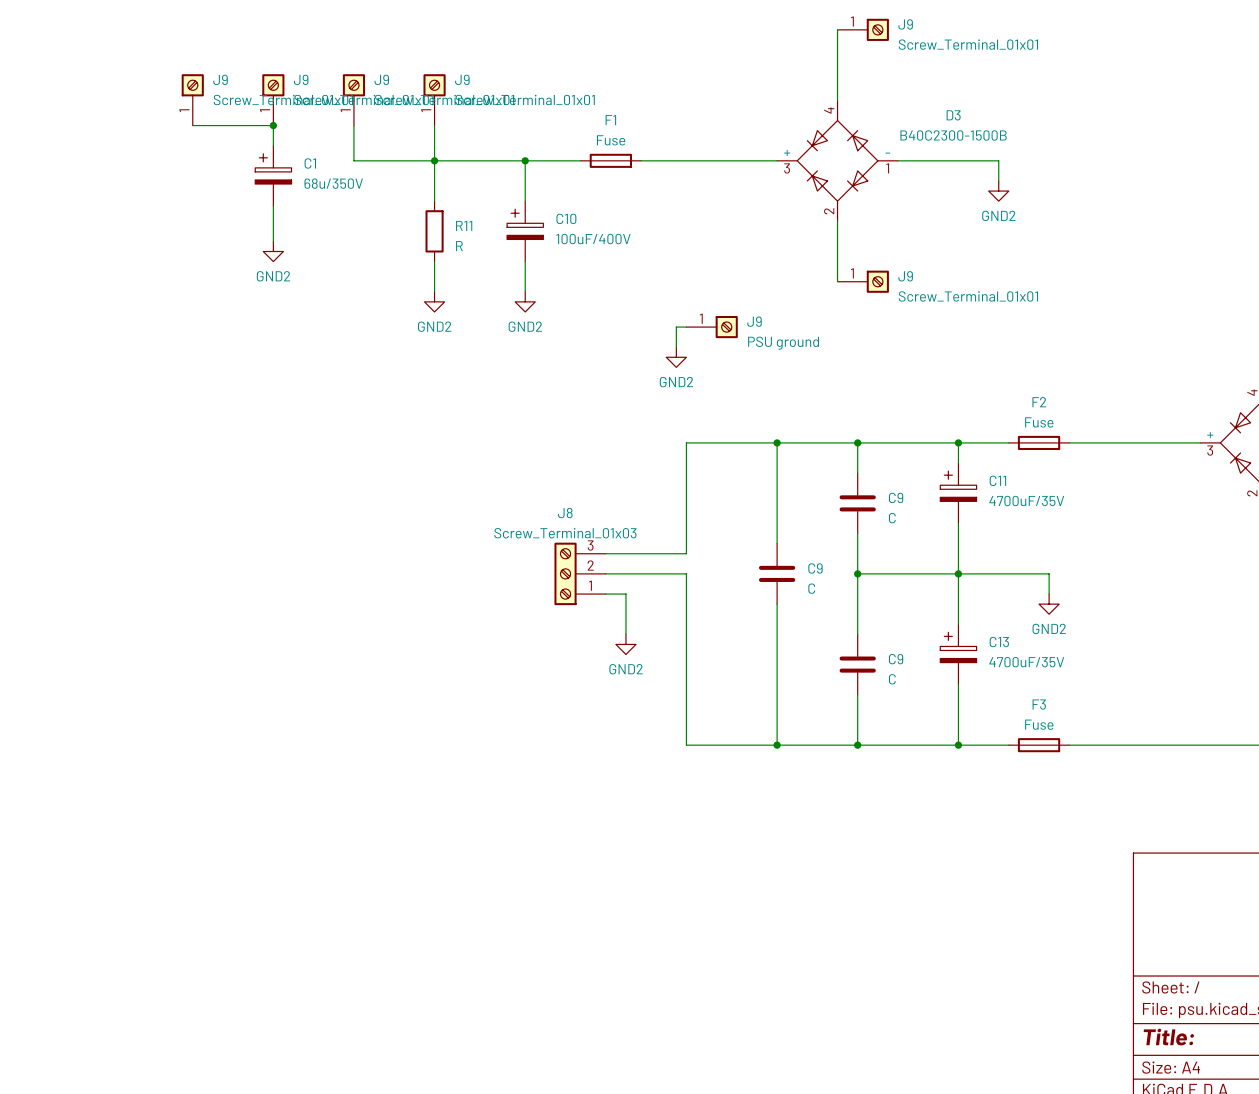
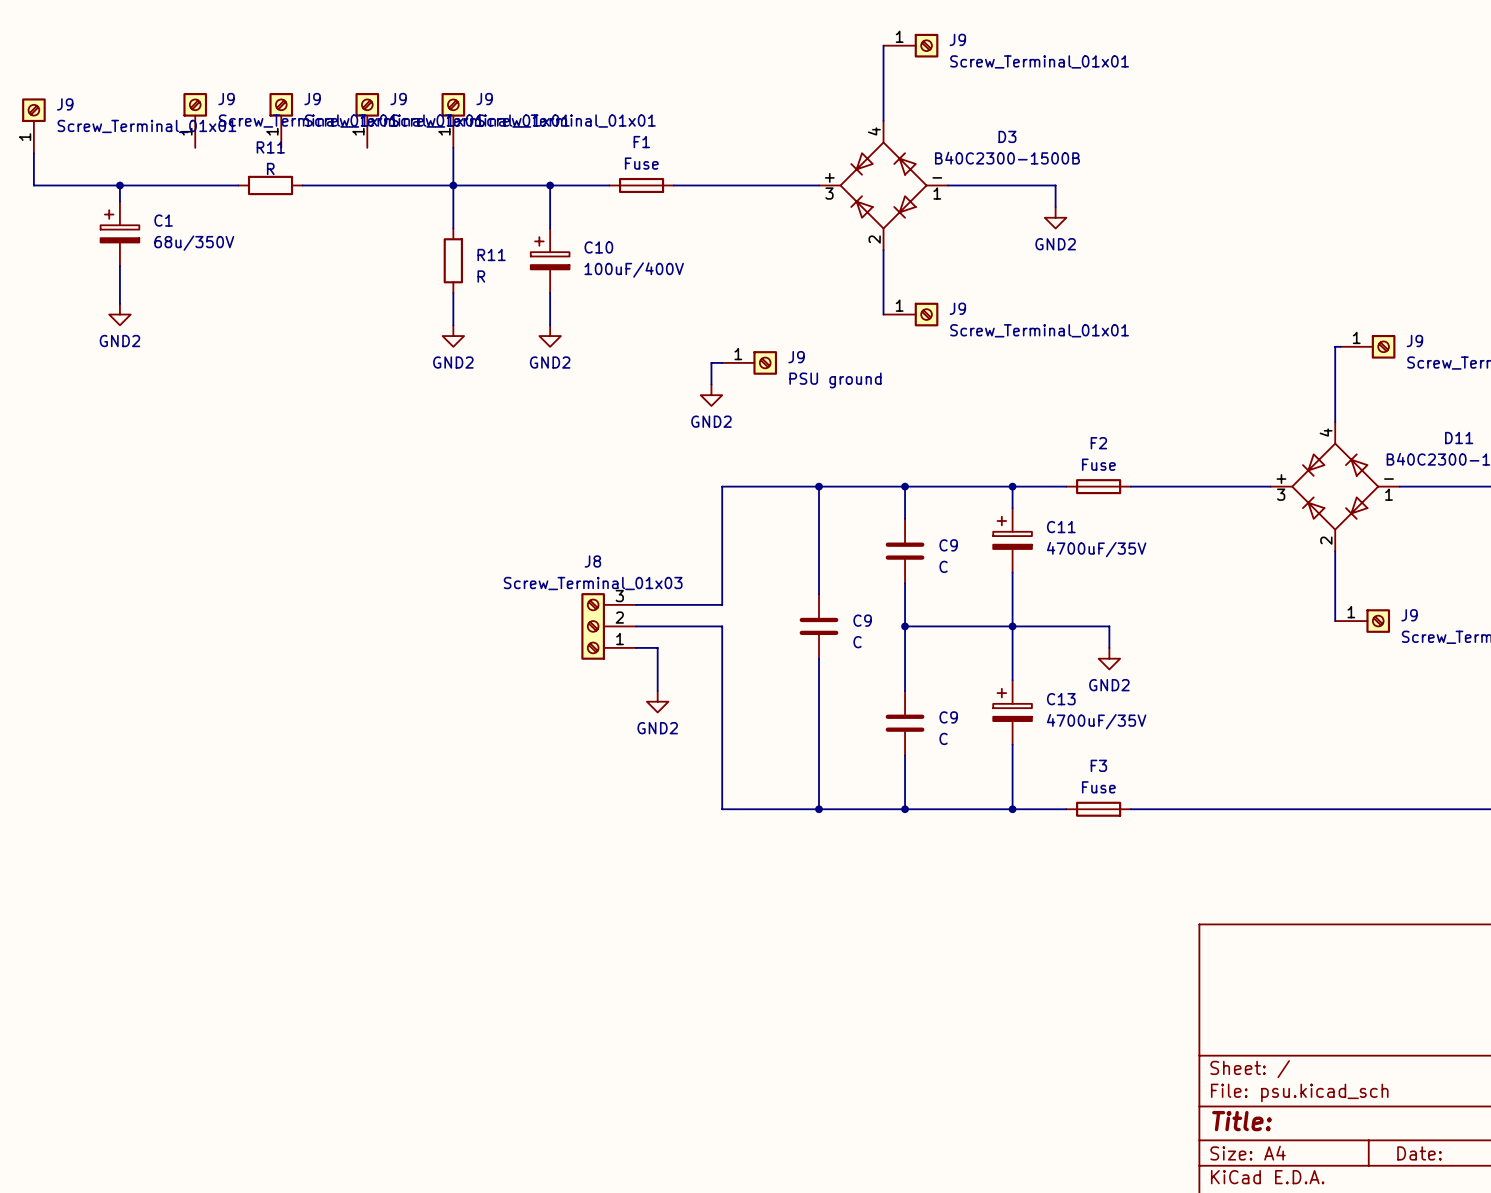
J9: none -> Screw_Terminal_01x01 (33, 125)
wire: (192, 125) (273, 125) (273, 145) -> none
junction: (273, 125) -> none
wire: (353, 125) (353, 160) -> (302, 185) (367, 185)
wire: none -> (33, 153) (33, 185) (238, 185)
wire: none -> (119, 185) (119, 201)
junction: none -> (119, 185)
R11: none -> R (270, 185)
C1 position: (273, 175) -> (119, 233)
wire: (273, 206) (273, 241) -> (119, 266) (119, 303)
power symbol position: GND2 (273, 251) -> GND2 (119, 314)

